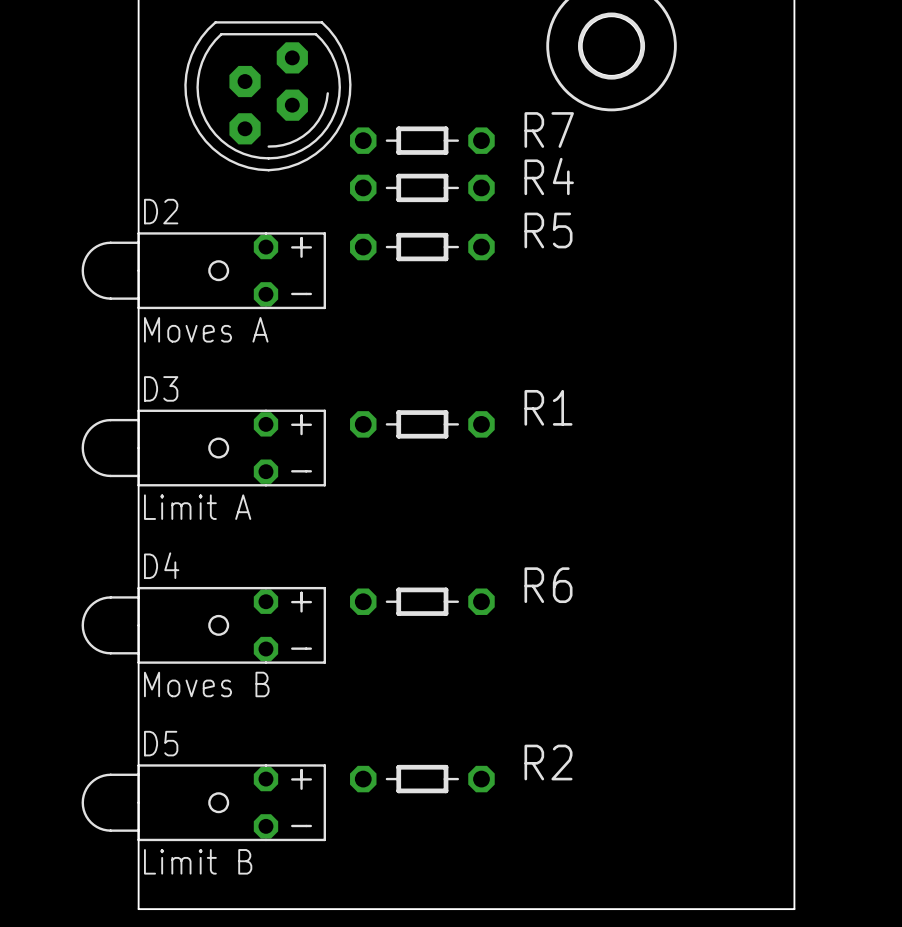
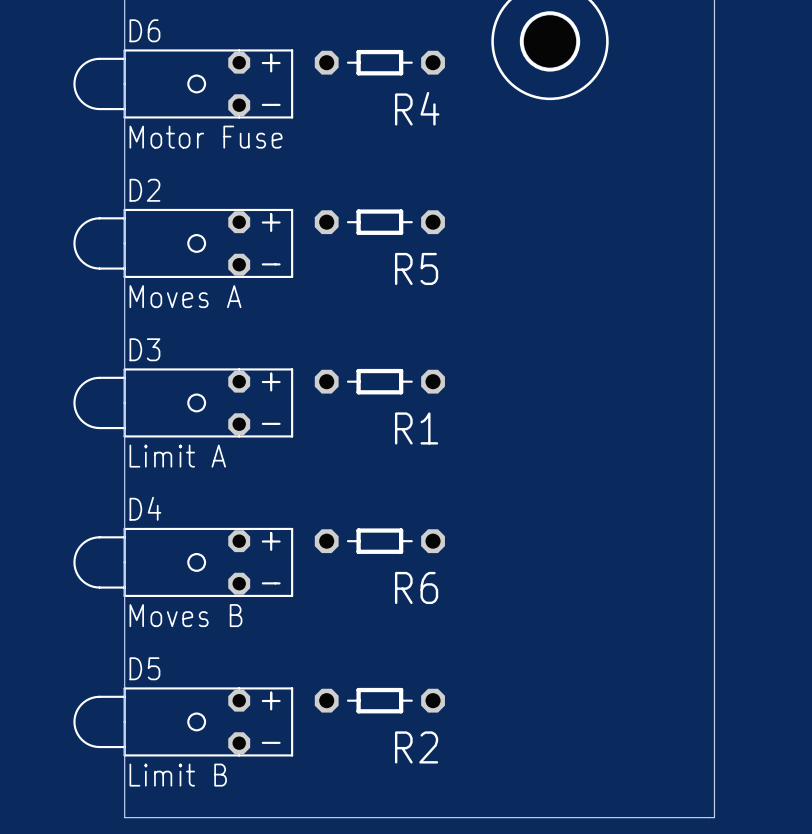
D6: none -> Motor Fuse (183, 83)
part: (267, 96) -> none
R7: (422, 140) -> none
R4 name position: R4 (549, 176) -> R4 (417, 108)
R4 position: (422, 187) -> (379, 62)
R5 name position: R5 (548, 230) -> R5 (416, 268)
R1 name position: R1 (548, 407) -> R1 (416, 428)
R6 name position: R6 (548, 585) -> R6 (416, 587)
R2 name position: R2 (548, 762) -> R2 (416, 747)

